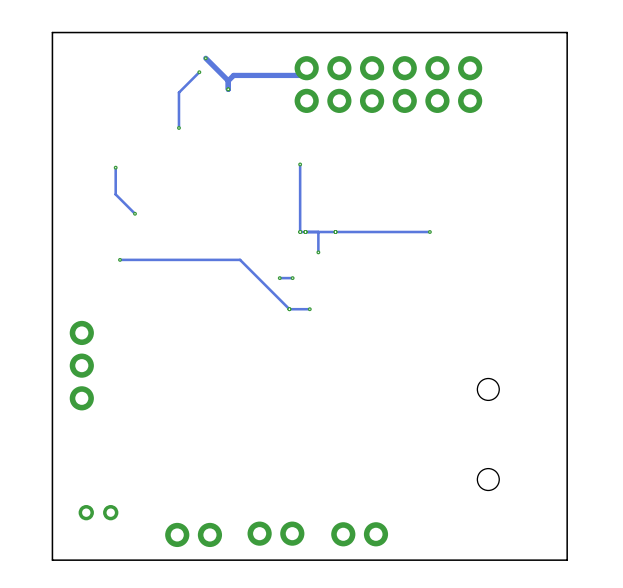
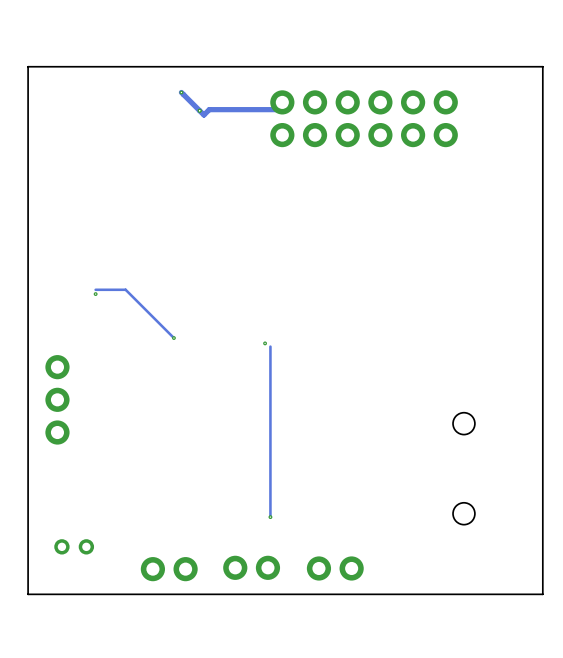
track: (199, 72) (178, 92) (178, 127) -> none
via: (199, 72) -> none
via: none -> (199, 110)
track: (228, 80) (228, 89) -> none
via: (228, 89) -> none
via: (178, 127) -> none
track: (300, 164) (300, 232) (429, 232) -> none
via: (300, 164) -> none
track: (115, 167) (115, 194) (135, 213) -> none
via: (115, 167) -> none
via: (135, 213) -> none
via: (300, 232) -> none
via: (305, 232) -> none
track: (318, 232) (318, 252) -> none
via: (335, 232) -> none
via: (429, 232) -> none
via: (318, 252) -> none
track: none -> (95, 289) (125, 289) (173, 338)
track: (119, 259) (240, 259) (289, 309) (309, 309) -> none
via: (279, 278) -> none
track: (292, 278) (279, 278) -> none
via: (292, 278) -> none
via: none -> (173, 338)
via: (309, 309) -> none
track: none -> (270, 346) (270, 517)
via: none -> (270, 517)

